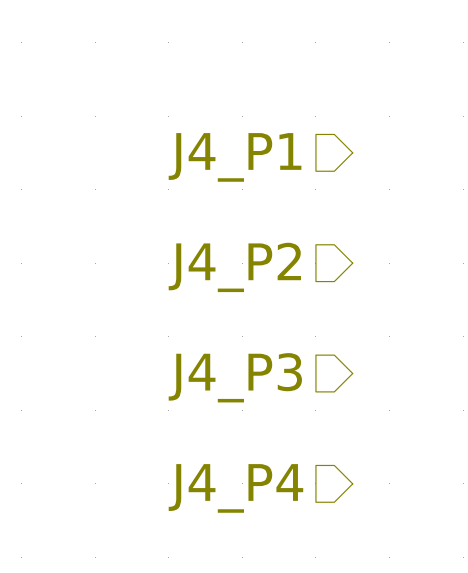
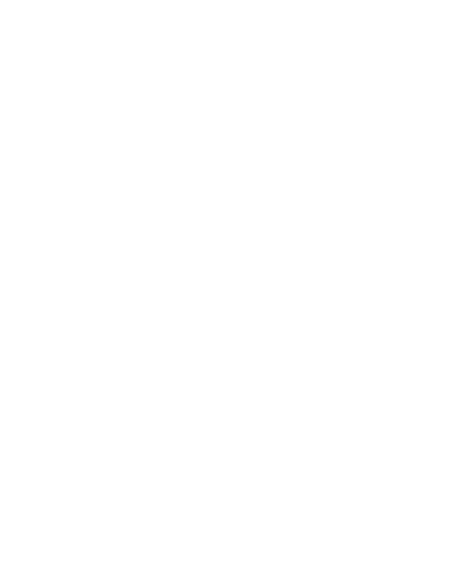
hierarchical label: J4_P1 (235, 157) -> none
hierarchical label: J4_P2 (234, 267) -> none
hierarchical label: J4_P3 (235, 377) -> none
hierarchical label: J4_P4 (235, 488) -> none

